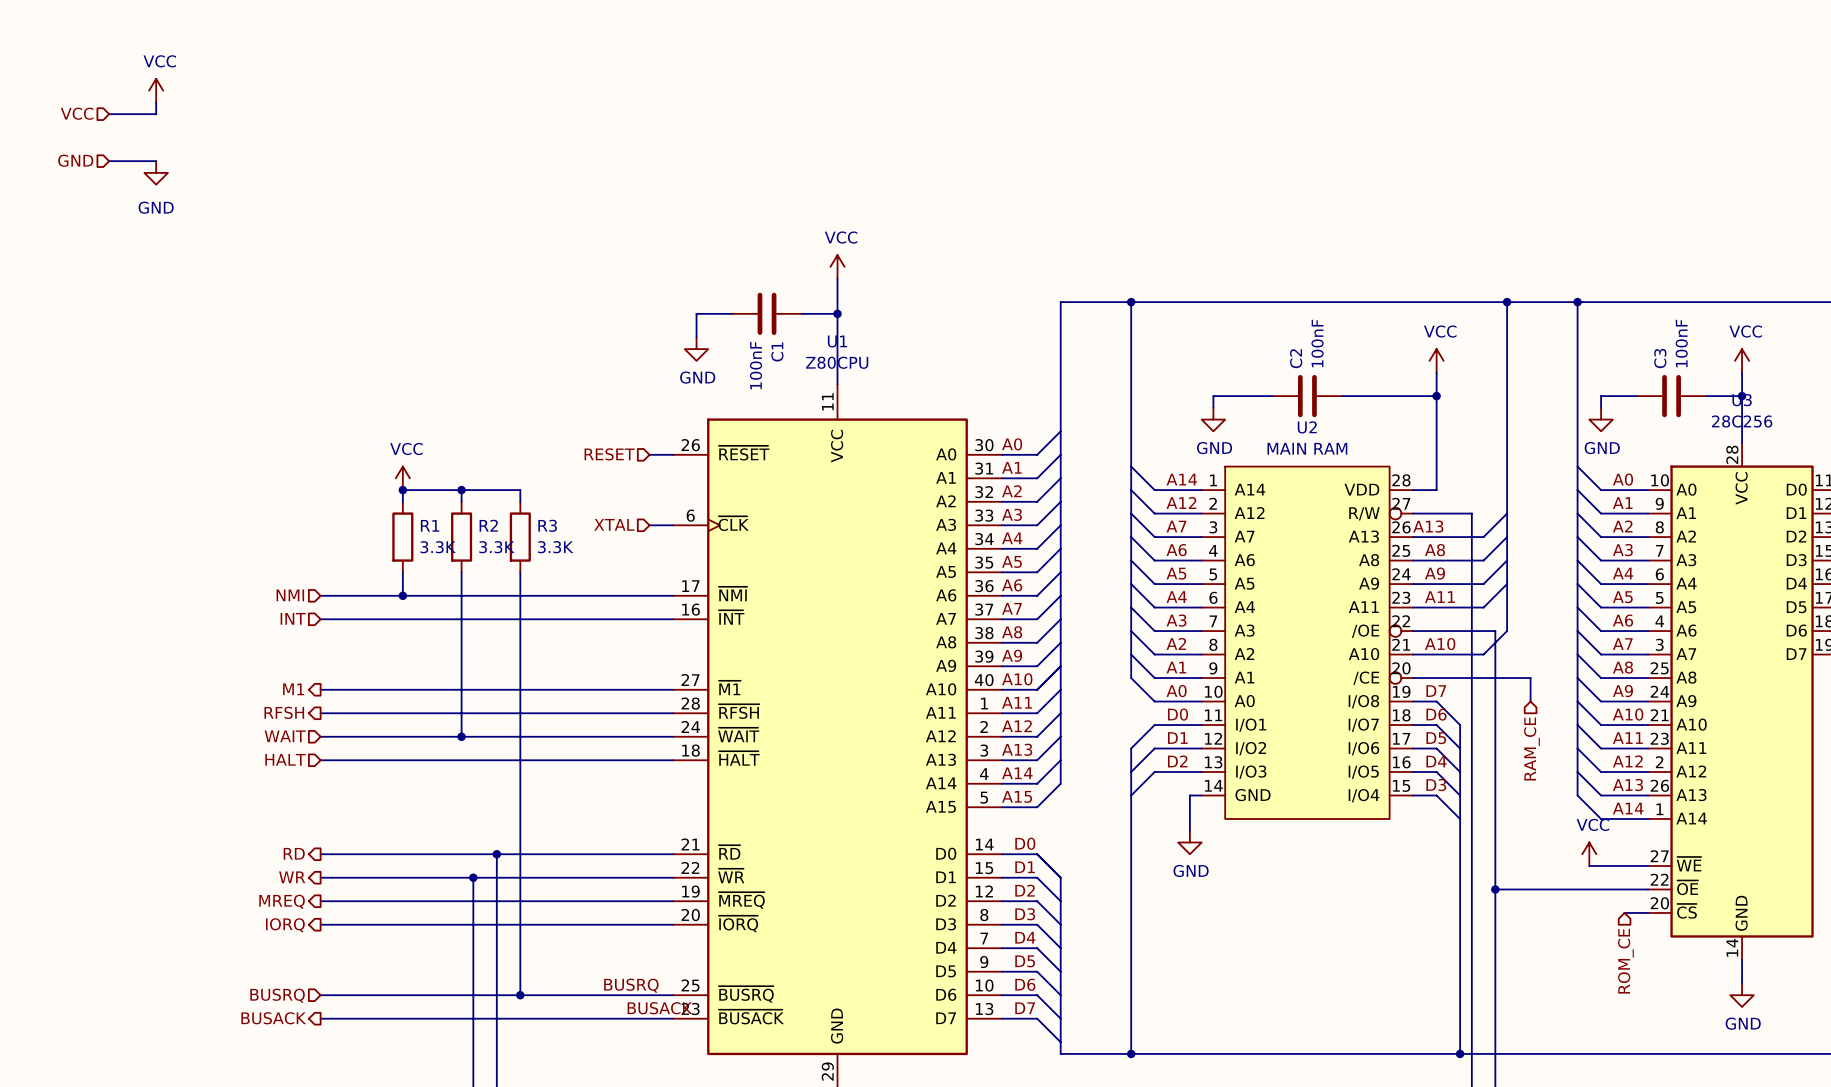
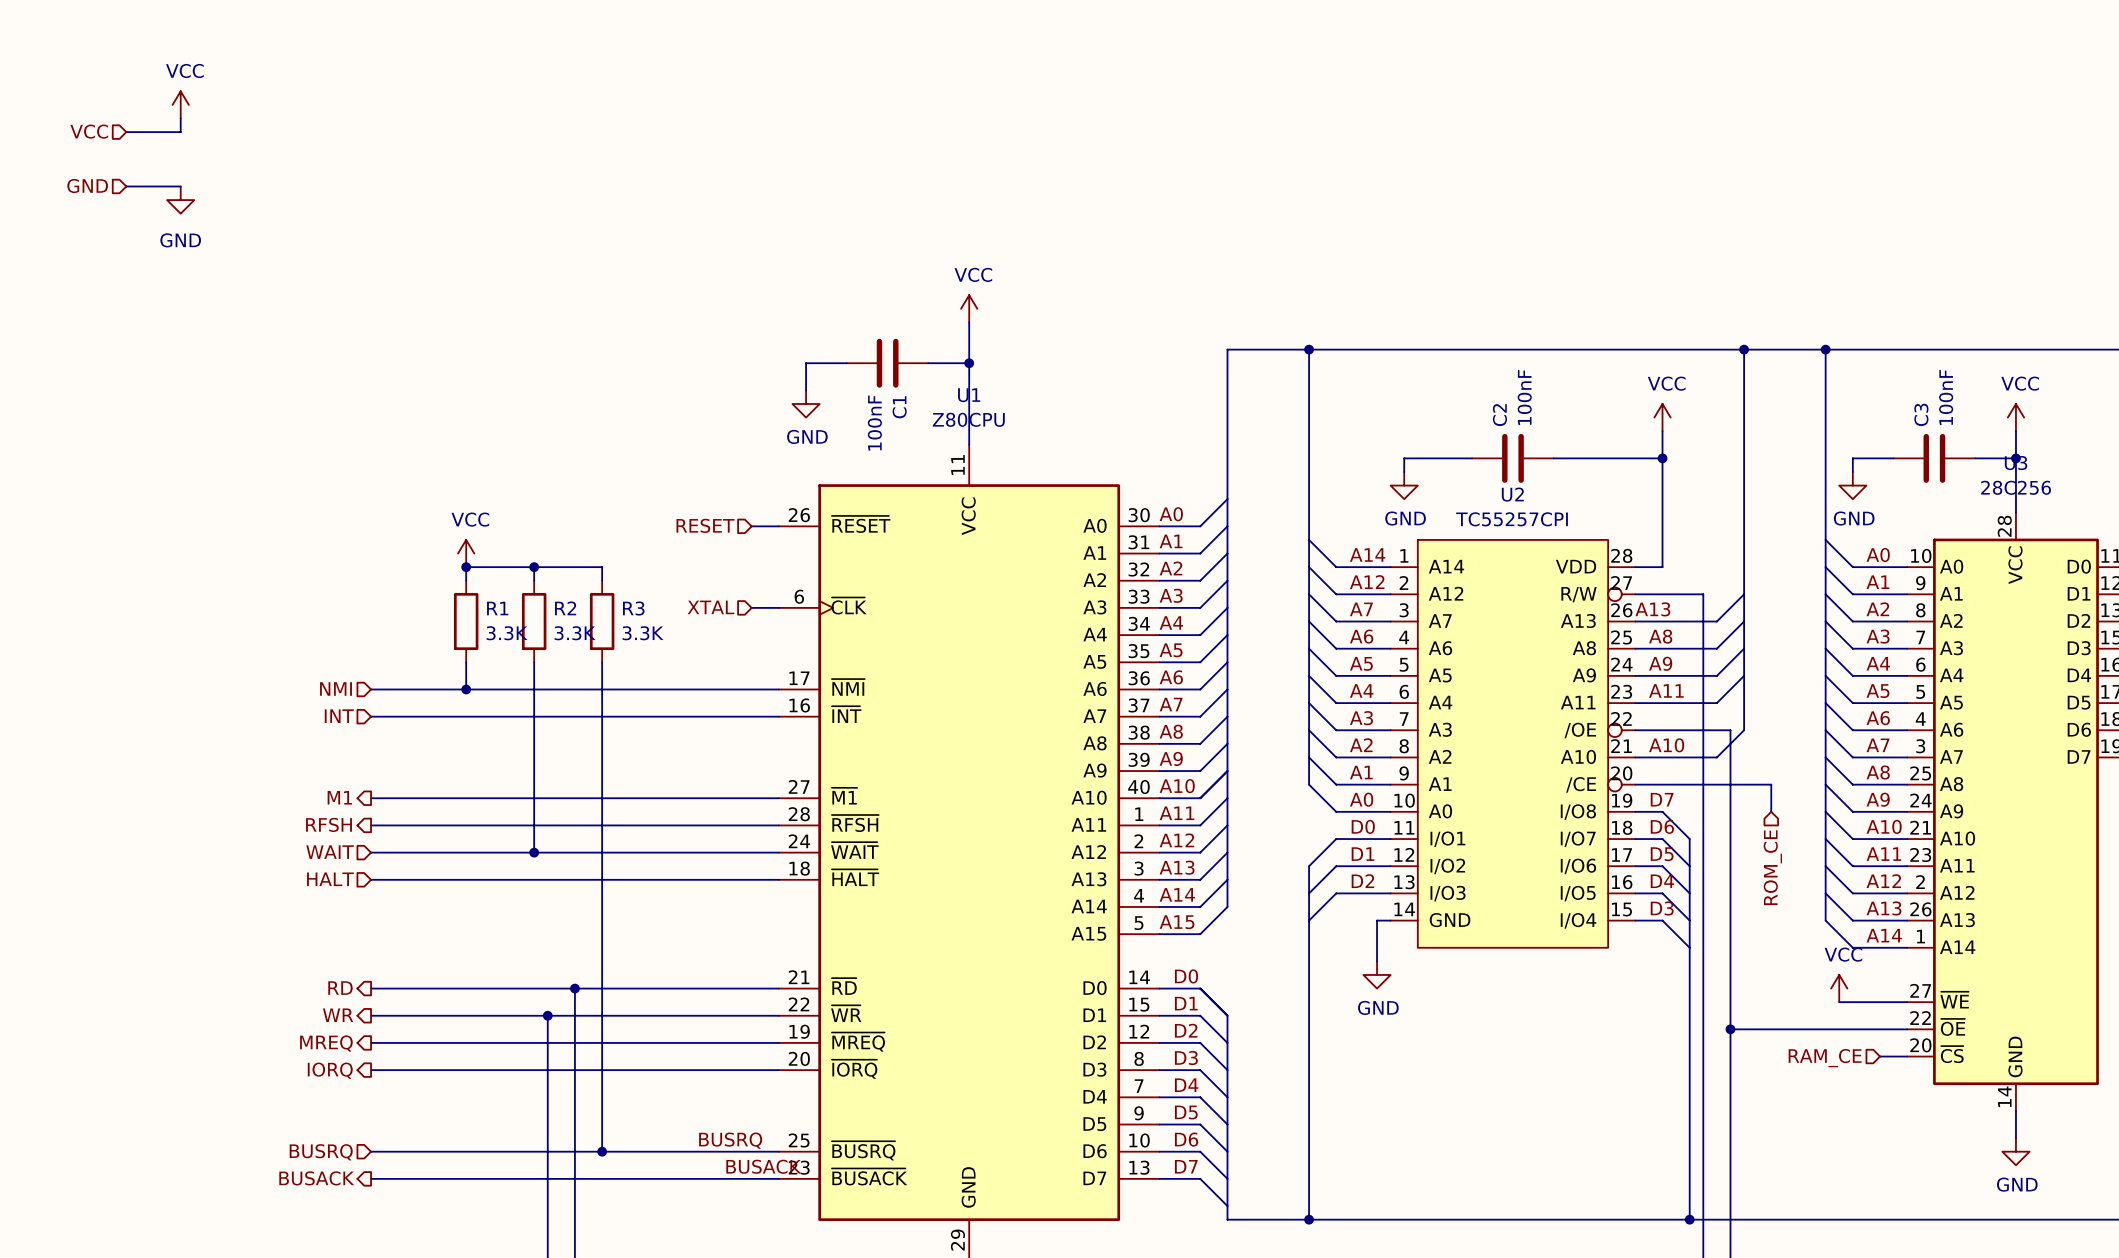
U2 value: MAIN RAM (1307, 448) -> TC55257CPI (1512, 519)
hierarchical label: RAM_CE (1531, 748) -> ROM_CE (1772, 867)
hierarchical label: none -> RAM_CE (1825, 1058)
hierarchical label: ROM_CE (1625, 961) -> none

